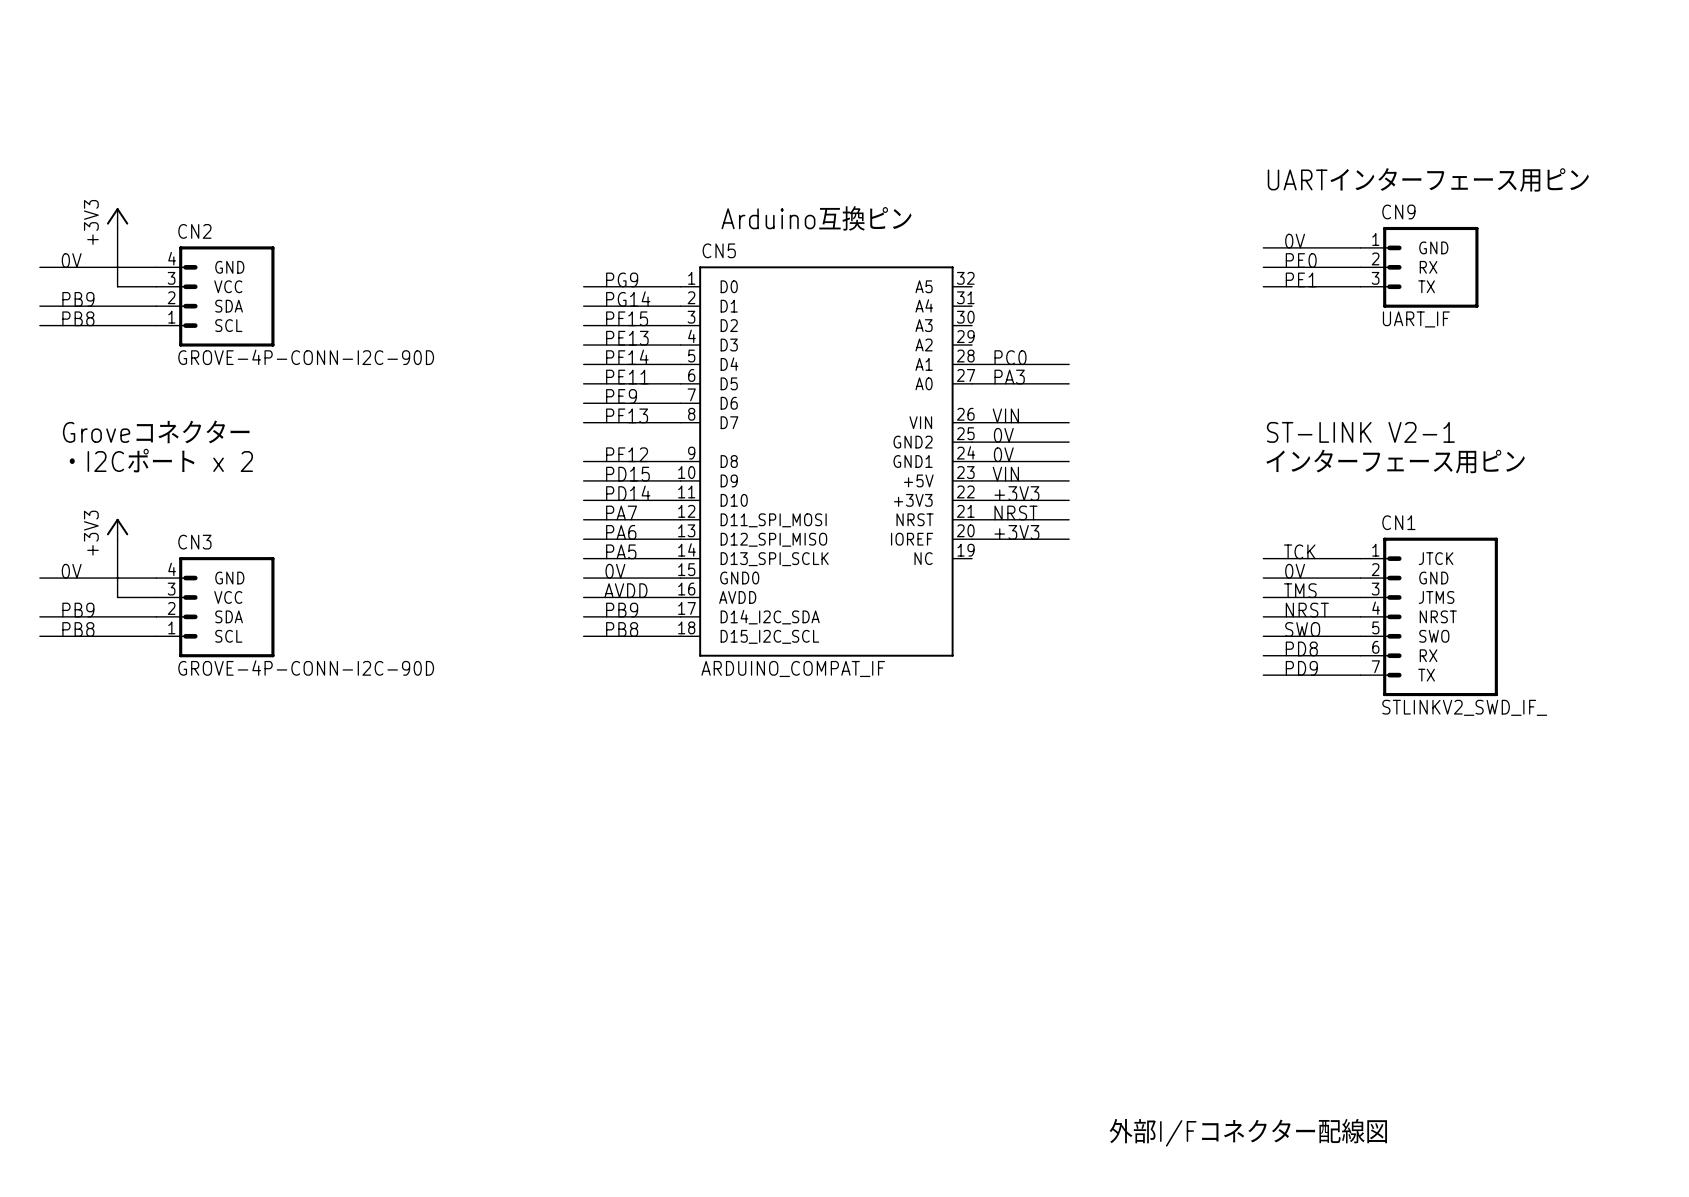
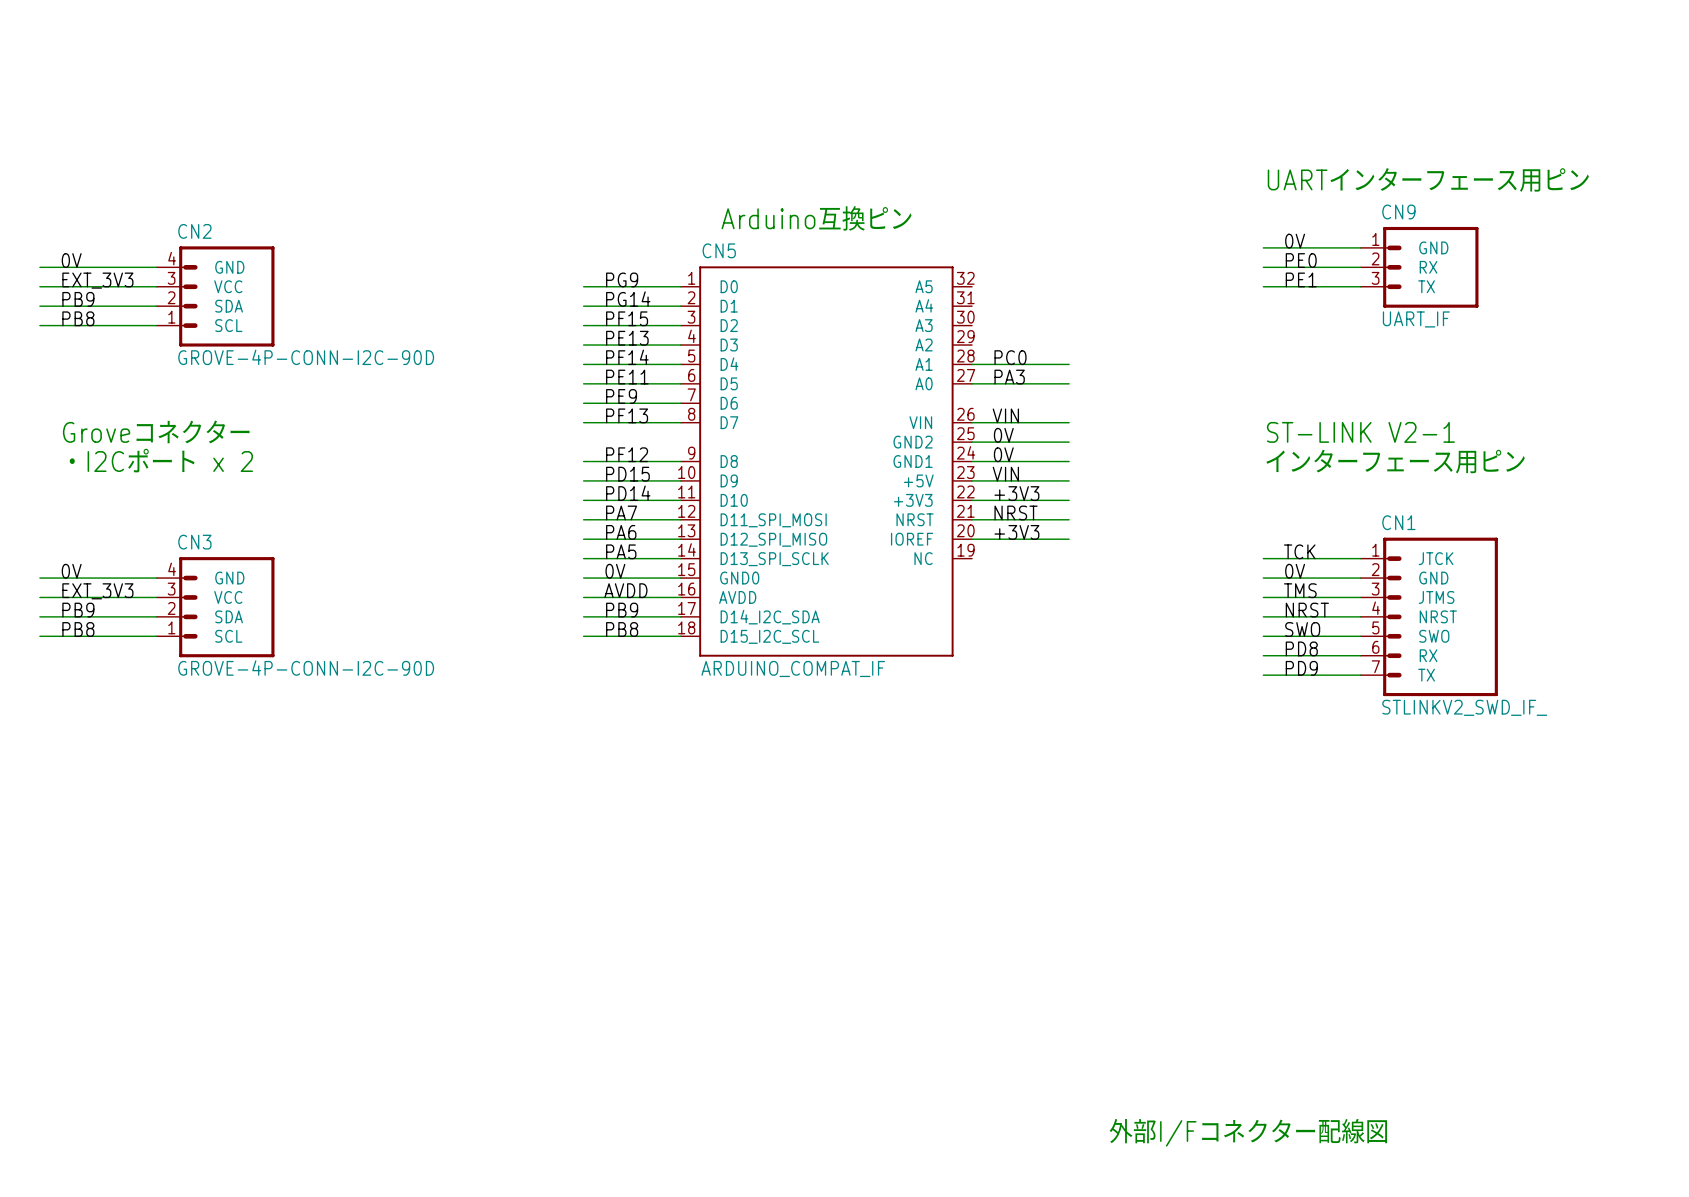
power symbol: +3V3 (117, 218) -> none
wire: (117, 228) (117, 286) -> (39, 286) (117, 286)
label: none -> EXT_3V3 (97, 280)
power symbol: +3V3 (117, 529) -> none
wire: (117, 539) (117, 597) -> (39, 597) (117, 597)
label: none -> EXT_3V3 (97, 591)

